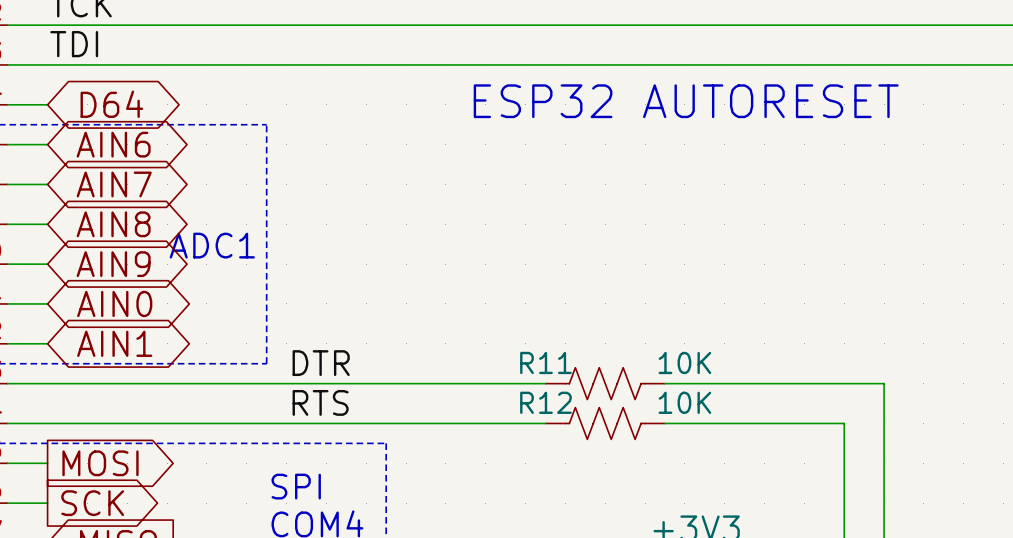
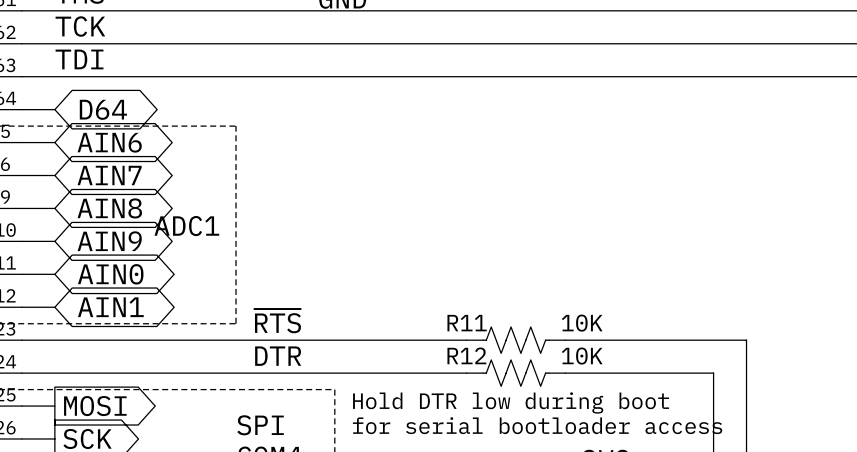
text: ESP32 AUTORESET (686, 101) -> none
label: DTR (321, 363) -> ~{RTS} (277, 321)
label: RTS (320, 402) -> DTR (278, 356)
text: none -> Hold DTR low during boot (511, 402)
text: none -> for serial bootloader access (537, 425)

